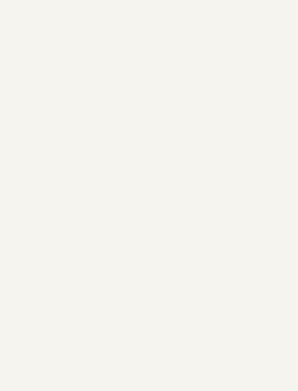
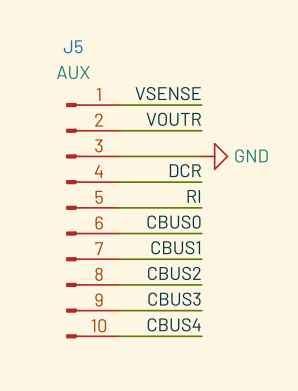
label: none -> VSENSE (168, 93)
wire: none -> (118, 105) (201, 105)
label: none -> VOUTR (173, 119)
wire: none -> (118, 130) (201, 130)
wire: none -> (118, 156) (201, 156)
power symbol: none -> GND (214, 156)
label: none -> DCR (185, 170)
wire: none -> (118, 182) (201, 182)
label: none -> RI (193, 196)
wire: none -> (118, 207) (201, 207)
J5: none -> AUX (92, 220)
label: none -> CBUS0 (173, 222)
wire: none -> (118, 233) (201, 233)
label: none -> CBUS1 (175, 247)
wire: none -> (118, 259) (201, 259)
label: none -> CBUS2 (174, 273)
wire: none -> (118, 284) (201, 284)
label: none -> CBUS3 (174, 299)
wire: none -> (118, 310) (201, 310)
label: none -> CBUS4 (174, 324)
wire: none -> (118, 336) (201, 336)

